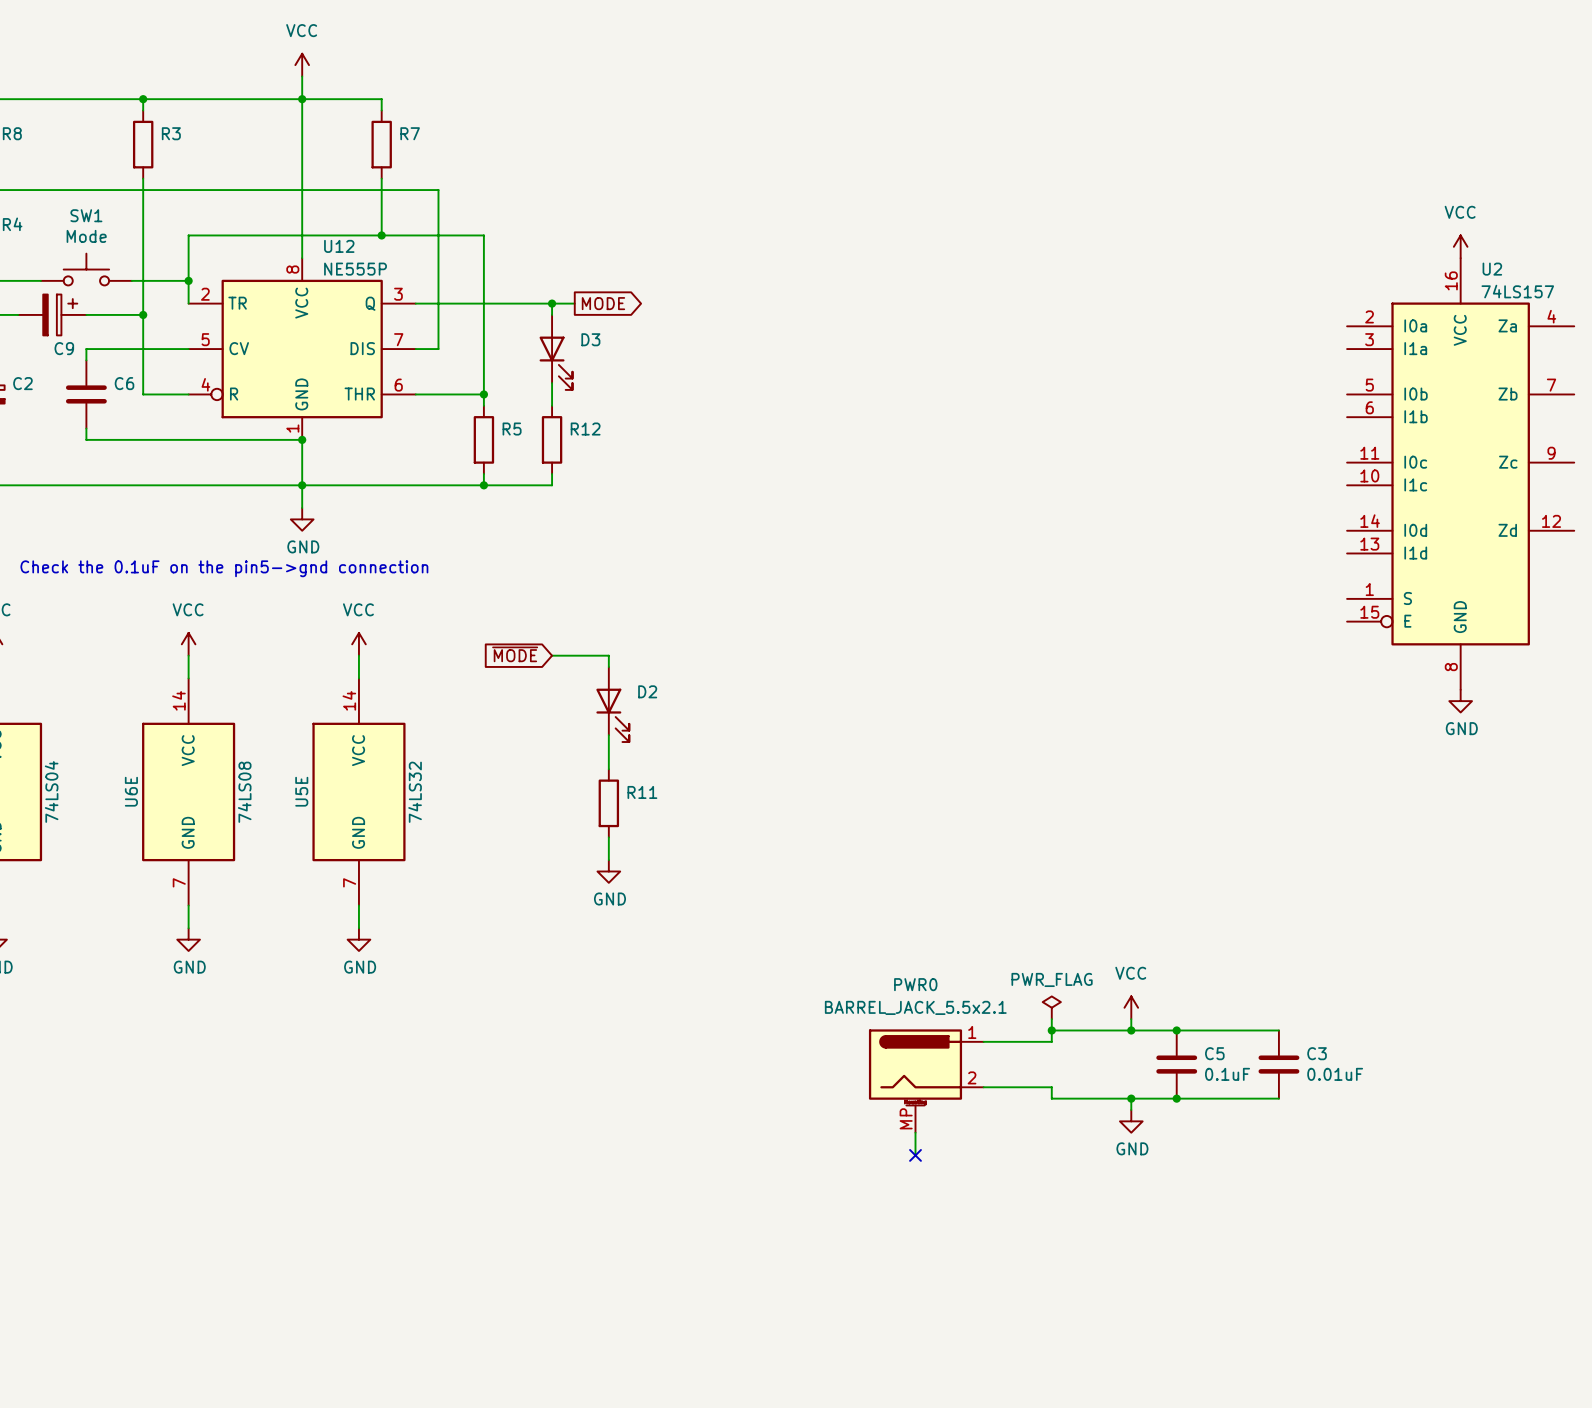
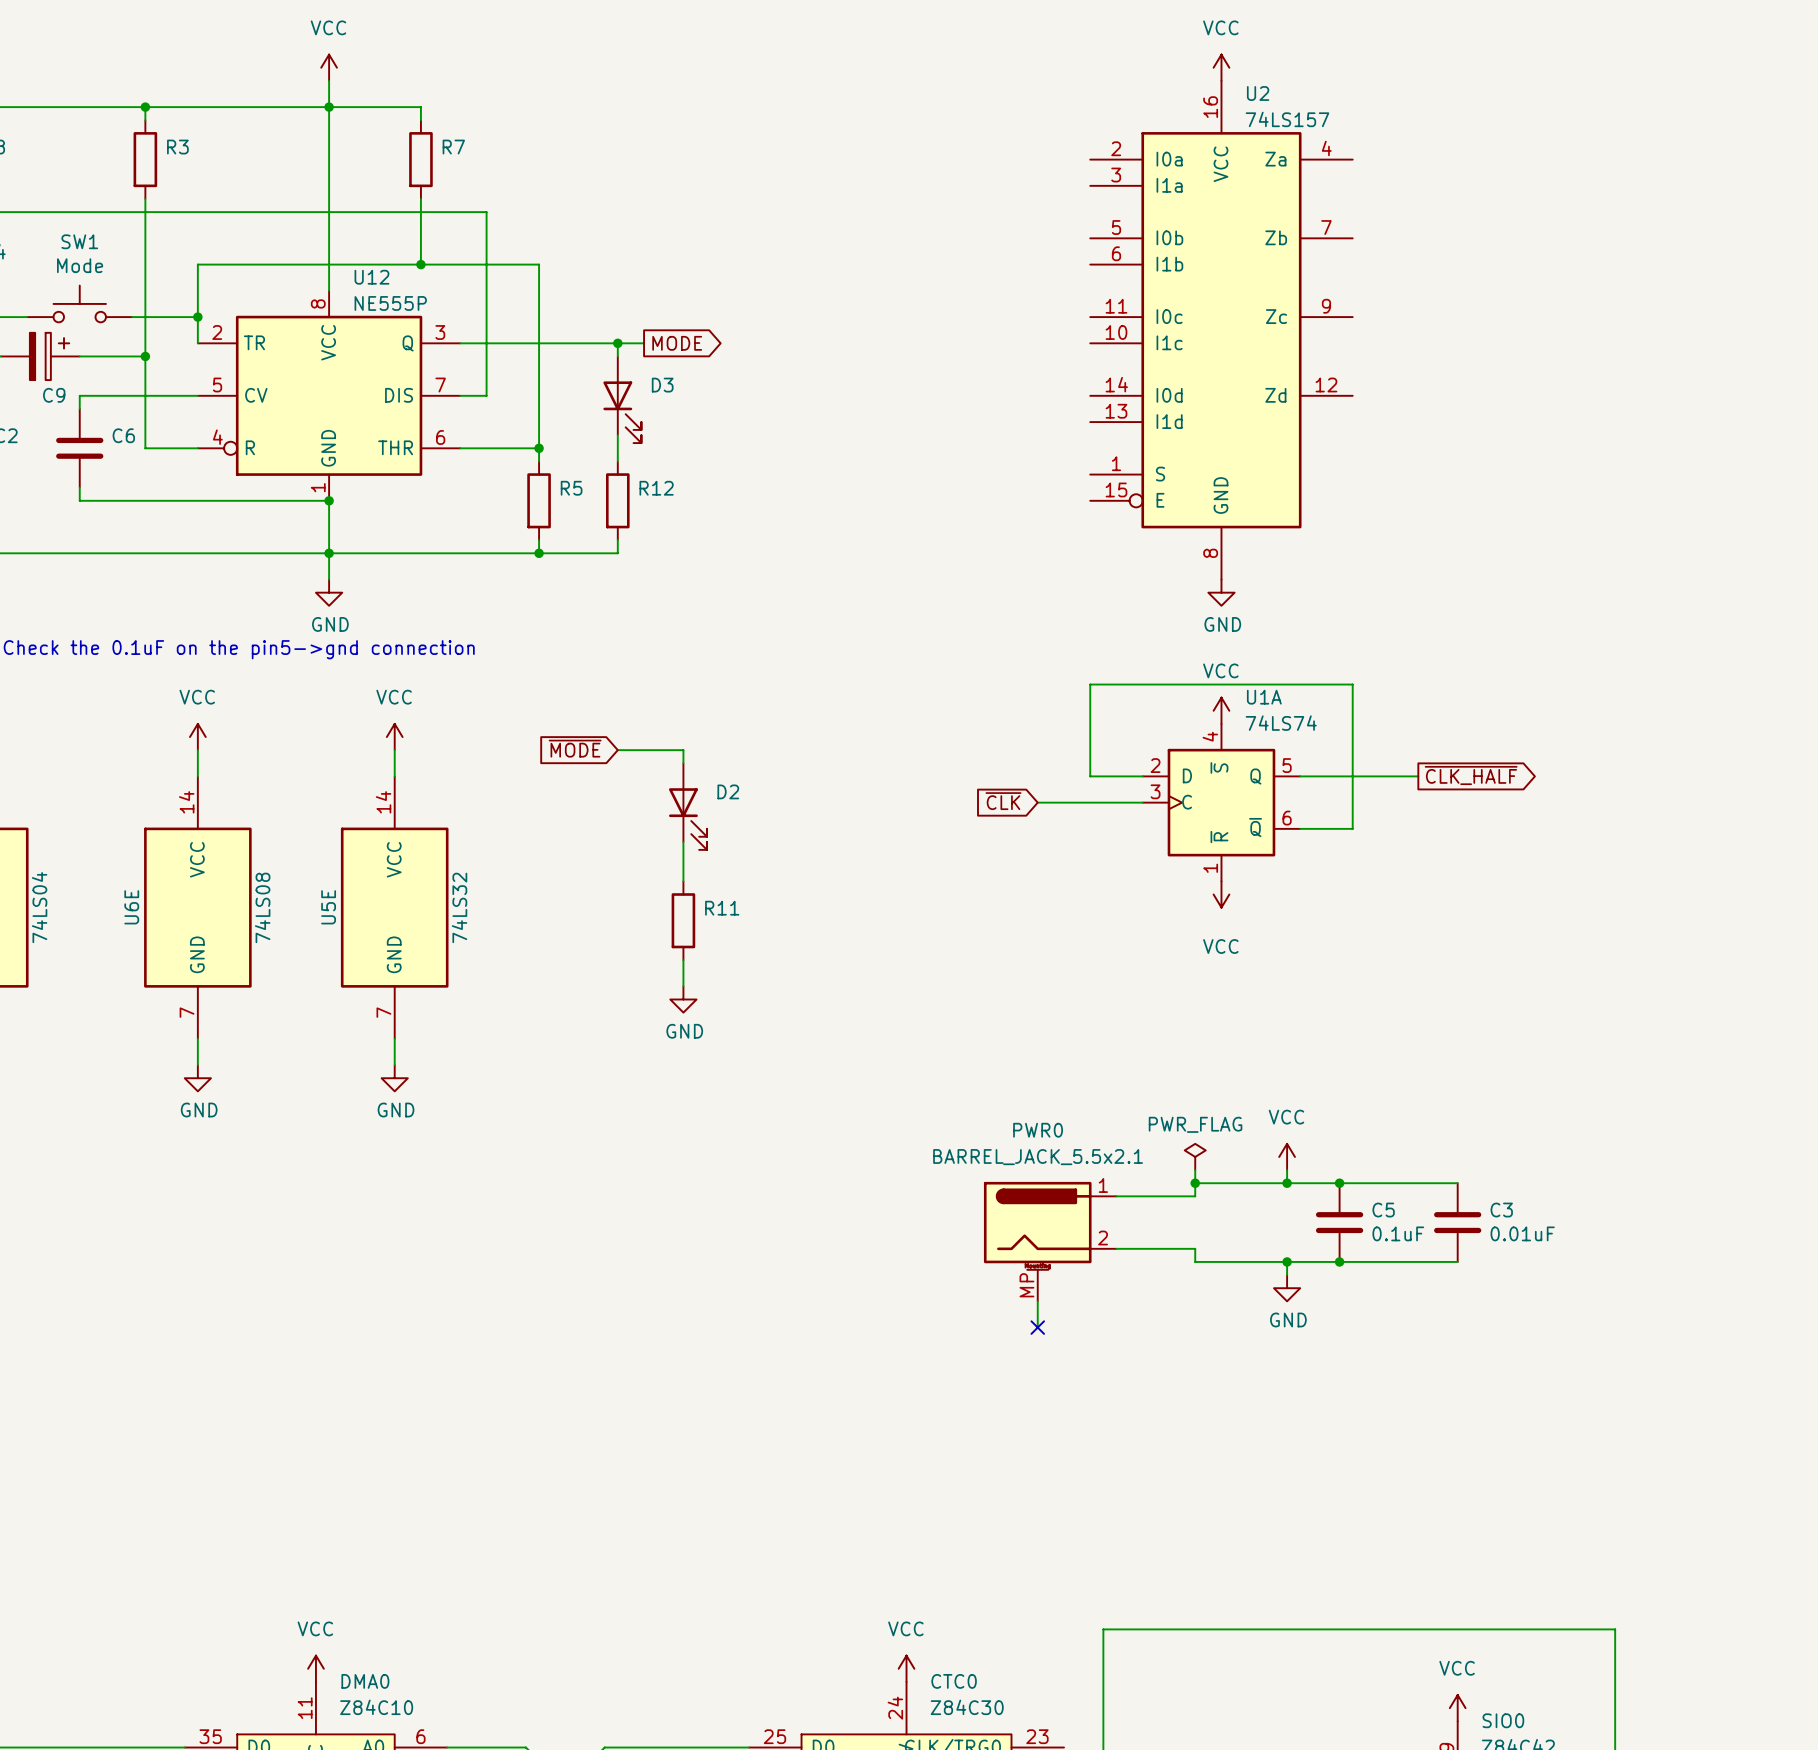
power symbol: none -> VCC (1221, 67)
power symbol: VCC (1460, 246) -> none
U2 position: (1460, 473) -> (1221, 330)
power symbol: none -> GND (1221, 592)
power symbol: none -> VCC (1221, 710)
global label: none -> ~{CLK_HALF} (1471, 775)
wire: none -> (1142, 776) (1090, 776) (1090, 684) (1352, 684) (1352, 828) (1300, 828)
wire: none -> (1300, 776) (1418, 776)
global label: none -> ~{CLK} (1003, 801)
wire: none -> (1037, 802) (1142, 802)
U1A: none -> 74LS74 (1221, 802)
power symbol: GND (1460, 701) -> none
power symbol: none -> VCC (1221, 894)

